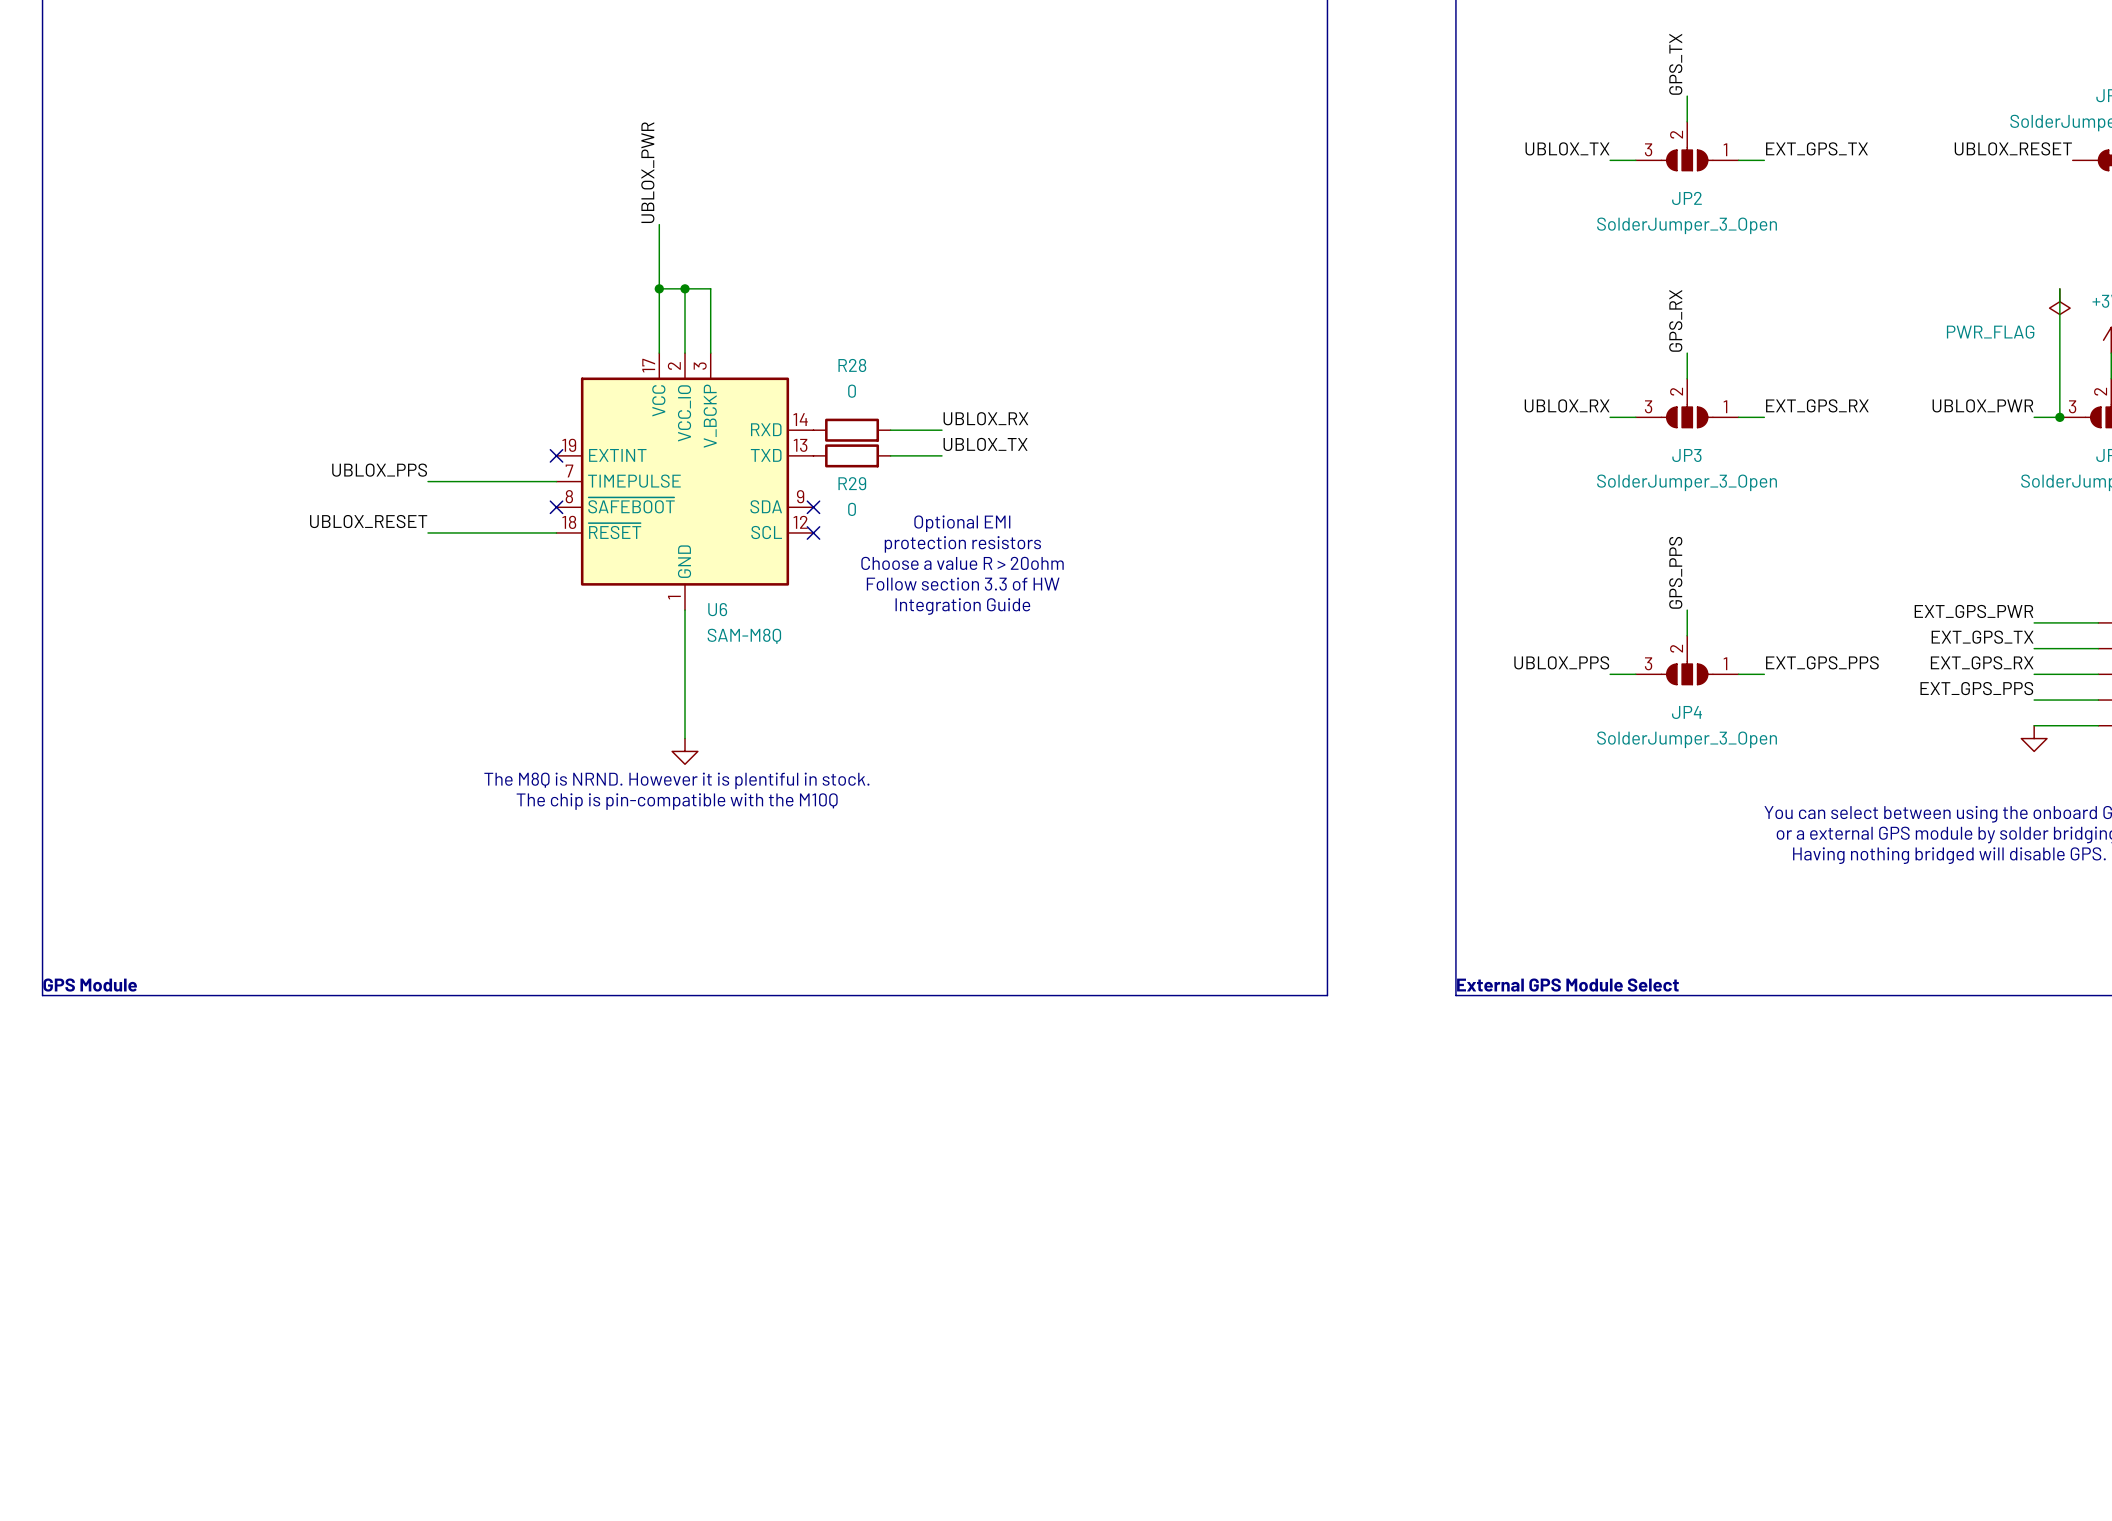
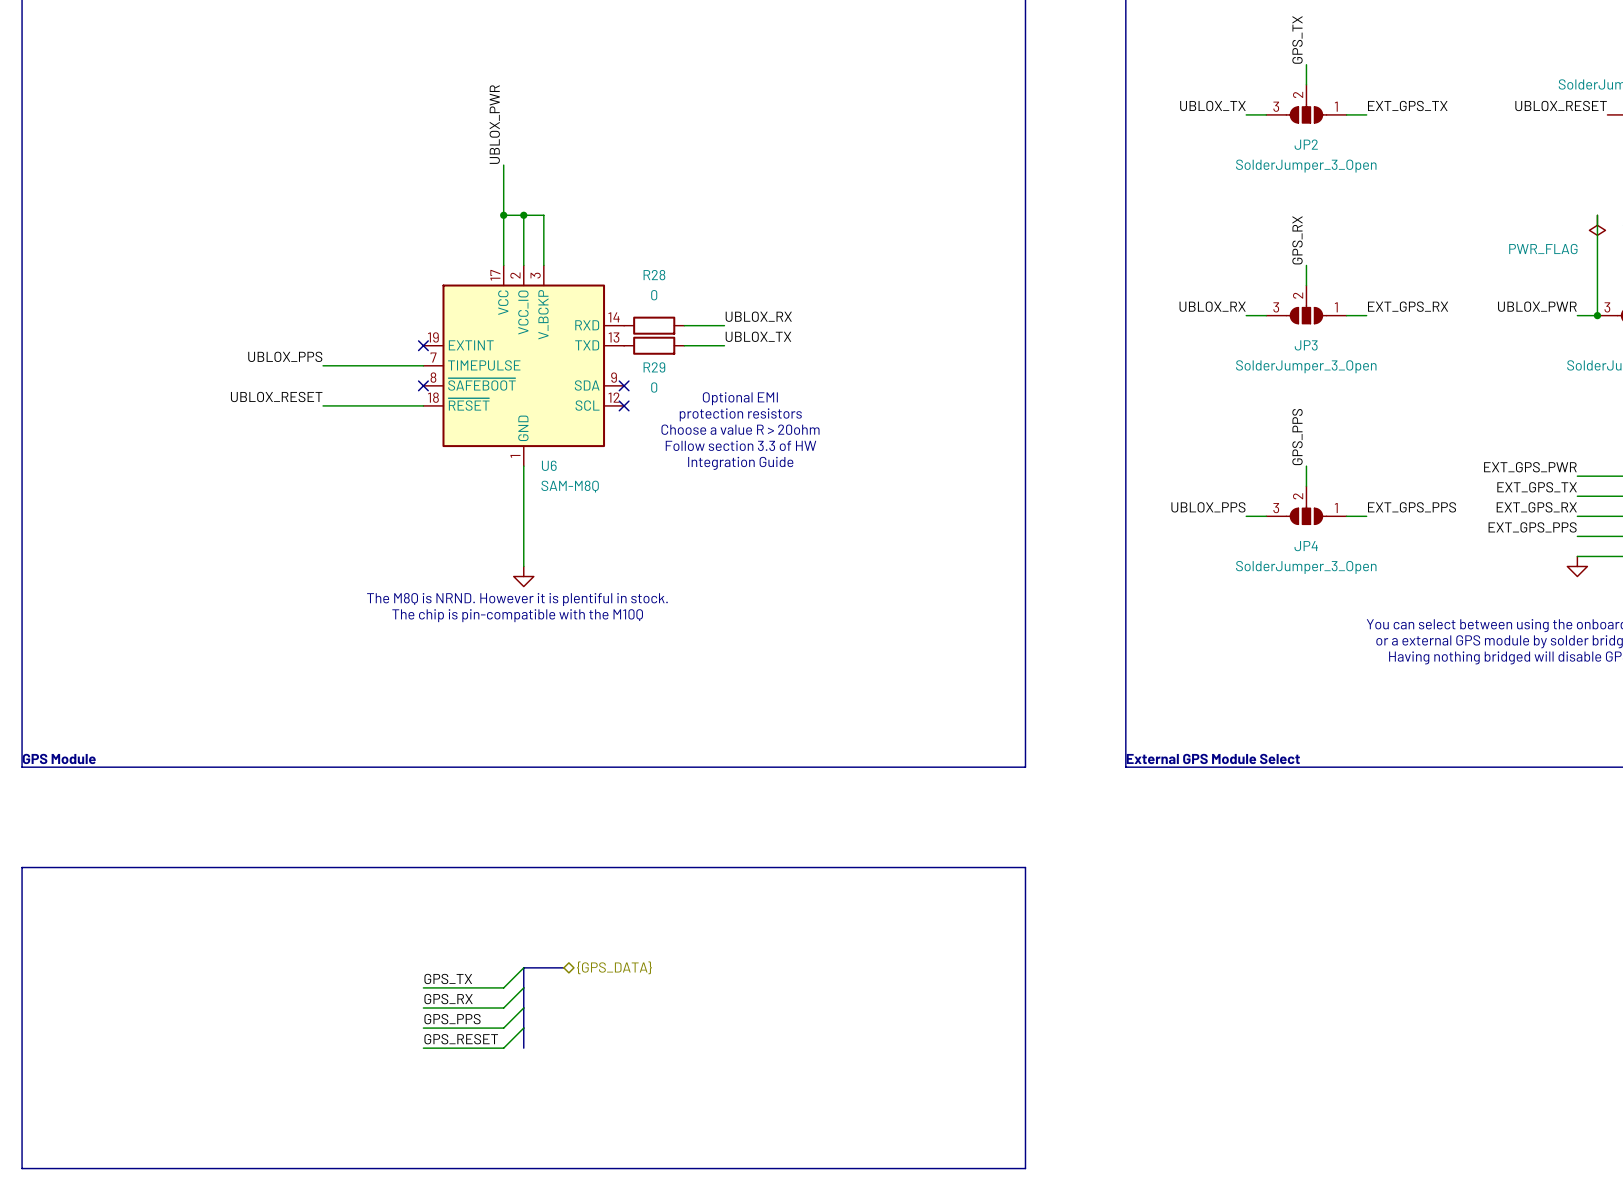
line: none -> (22, 867) (1025, 867) (1025, 1168) (22, 1168) (22, 867)
wire: none -> (523, 967) (503, 987) (423, 987)
bus: none -> (563, 967) (523, 967) (523, 1048)
hierarchical label: none -> {GPS_DATA} (614, 967)
label: none -> GPS_TX (448, 978)
wire: none -> (523, 987) (503, 1008) (423, 1008)
label: none -> GPS_RX (448, 999)
wire: none -> (523, 1008) (503, 1028) (423, 1028)
label: none -> GPS_PPS (452, 1019)
wire: none -> (523, 1028) (503, 1048) (423, 1048)
label: none -> GPS_RESET (461, 1039)

